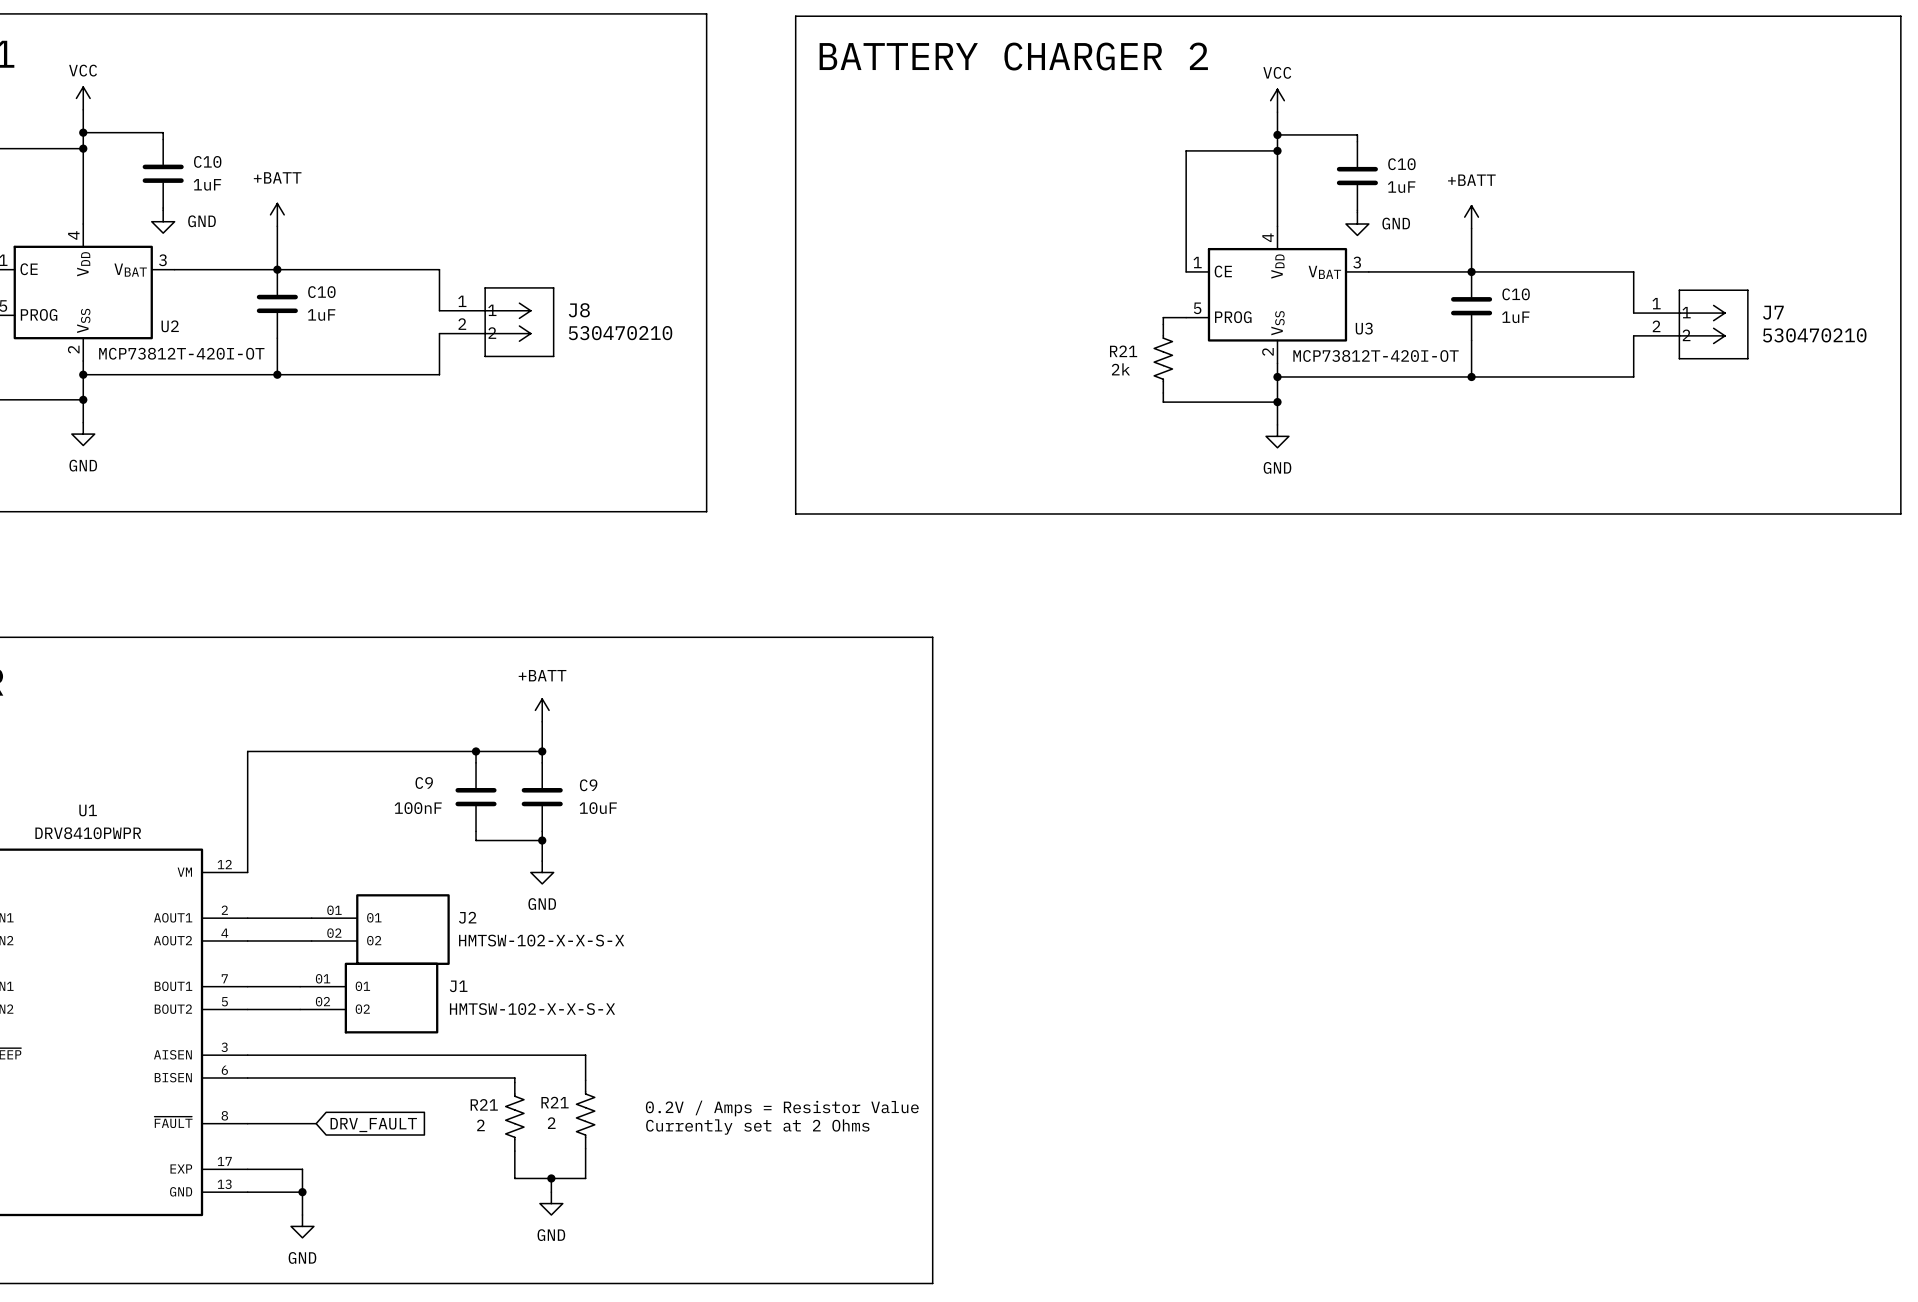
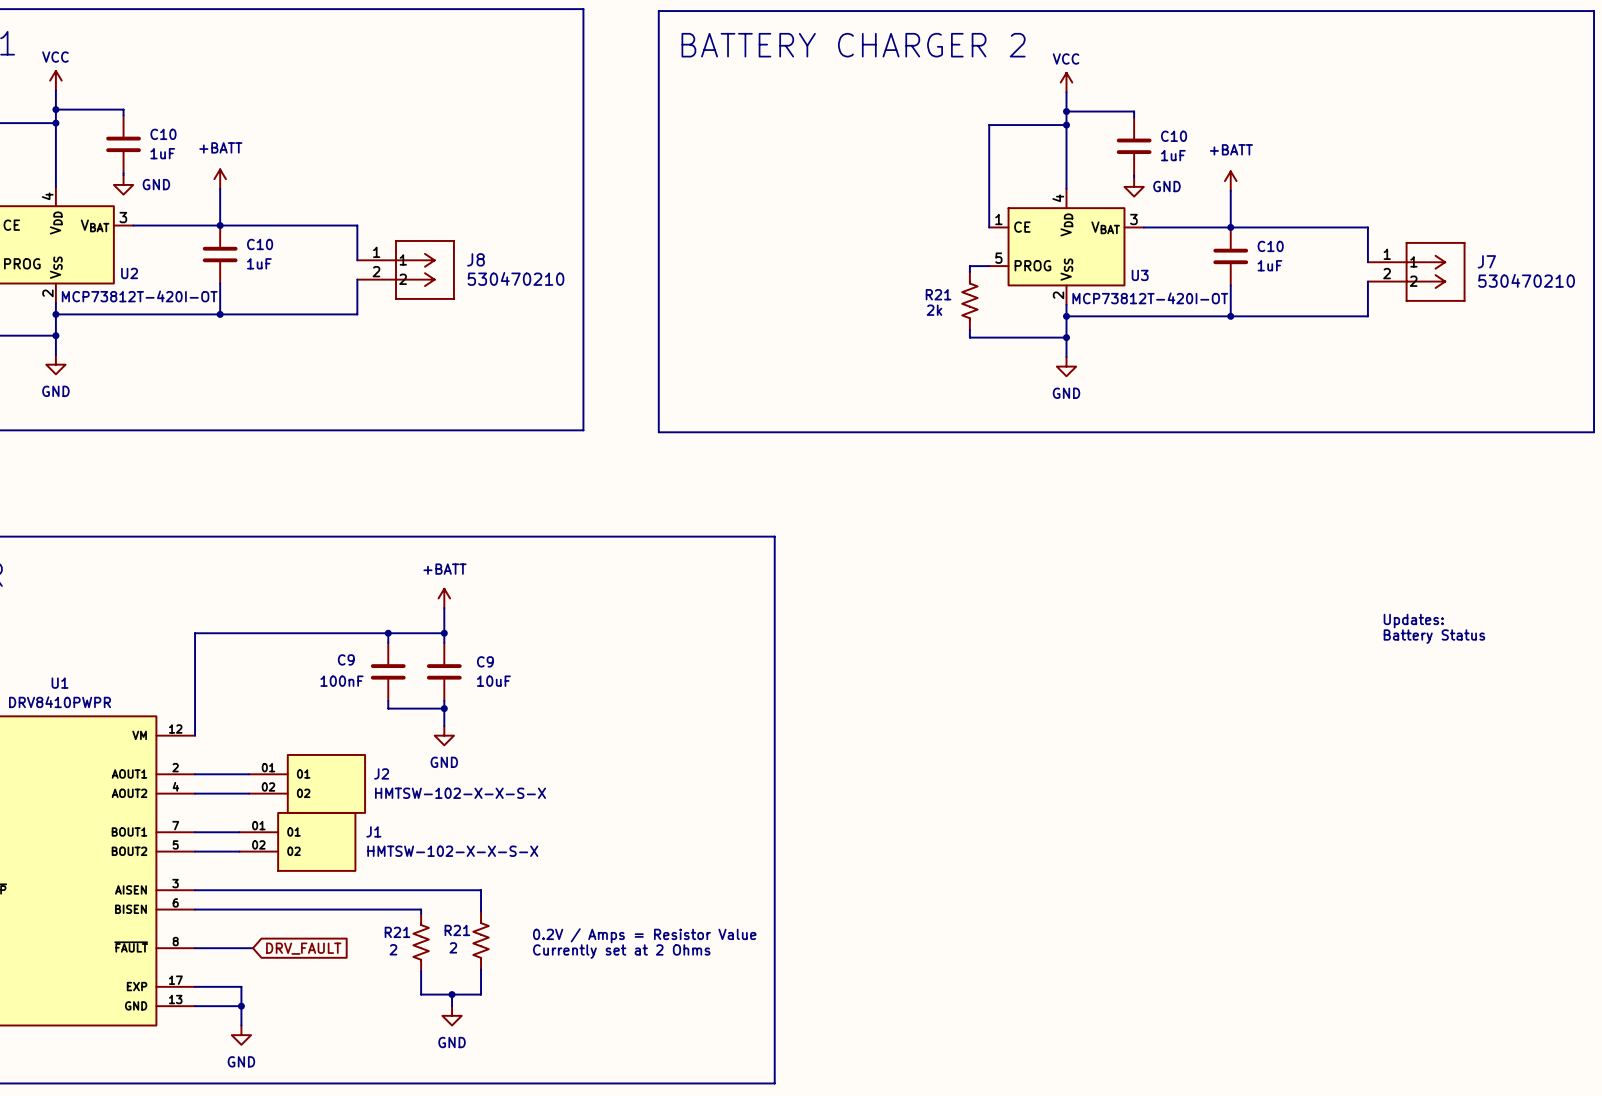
text: none -> Updates: (1413, 621)
text: none -> Battery Status (1434, 636)

